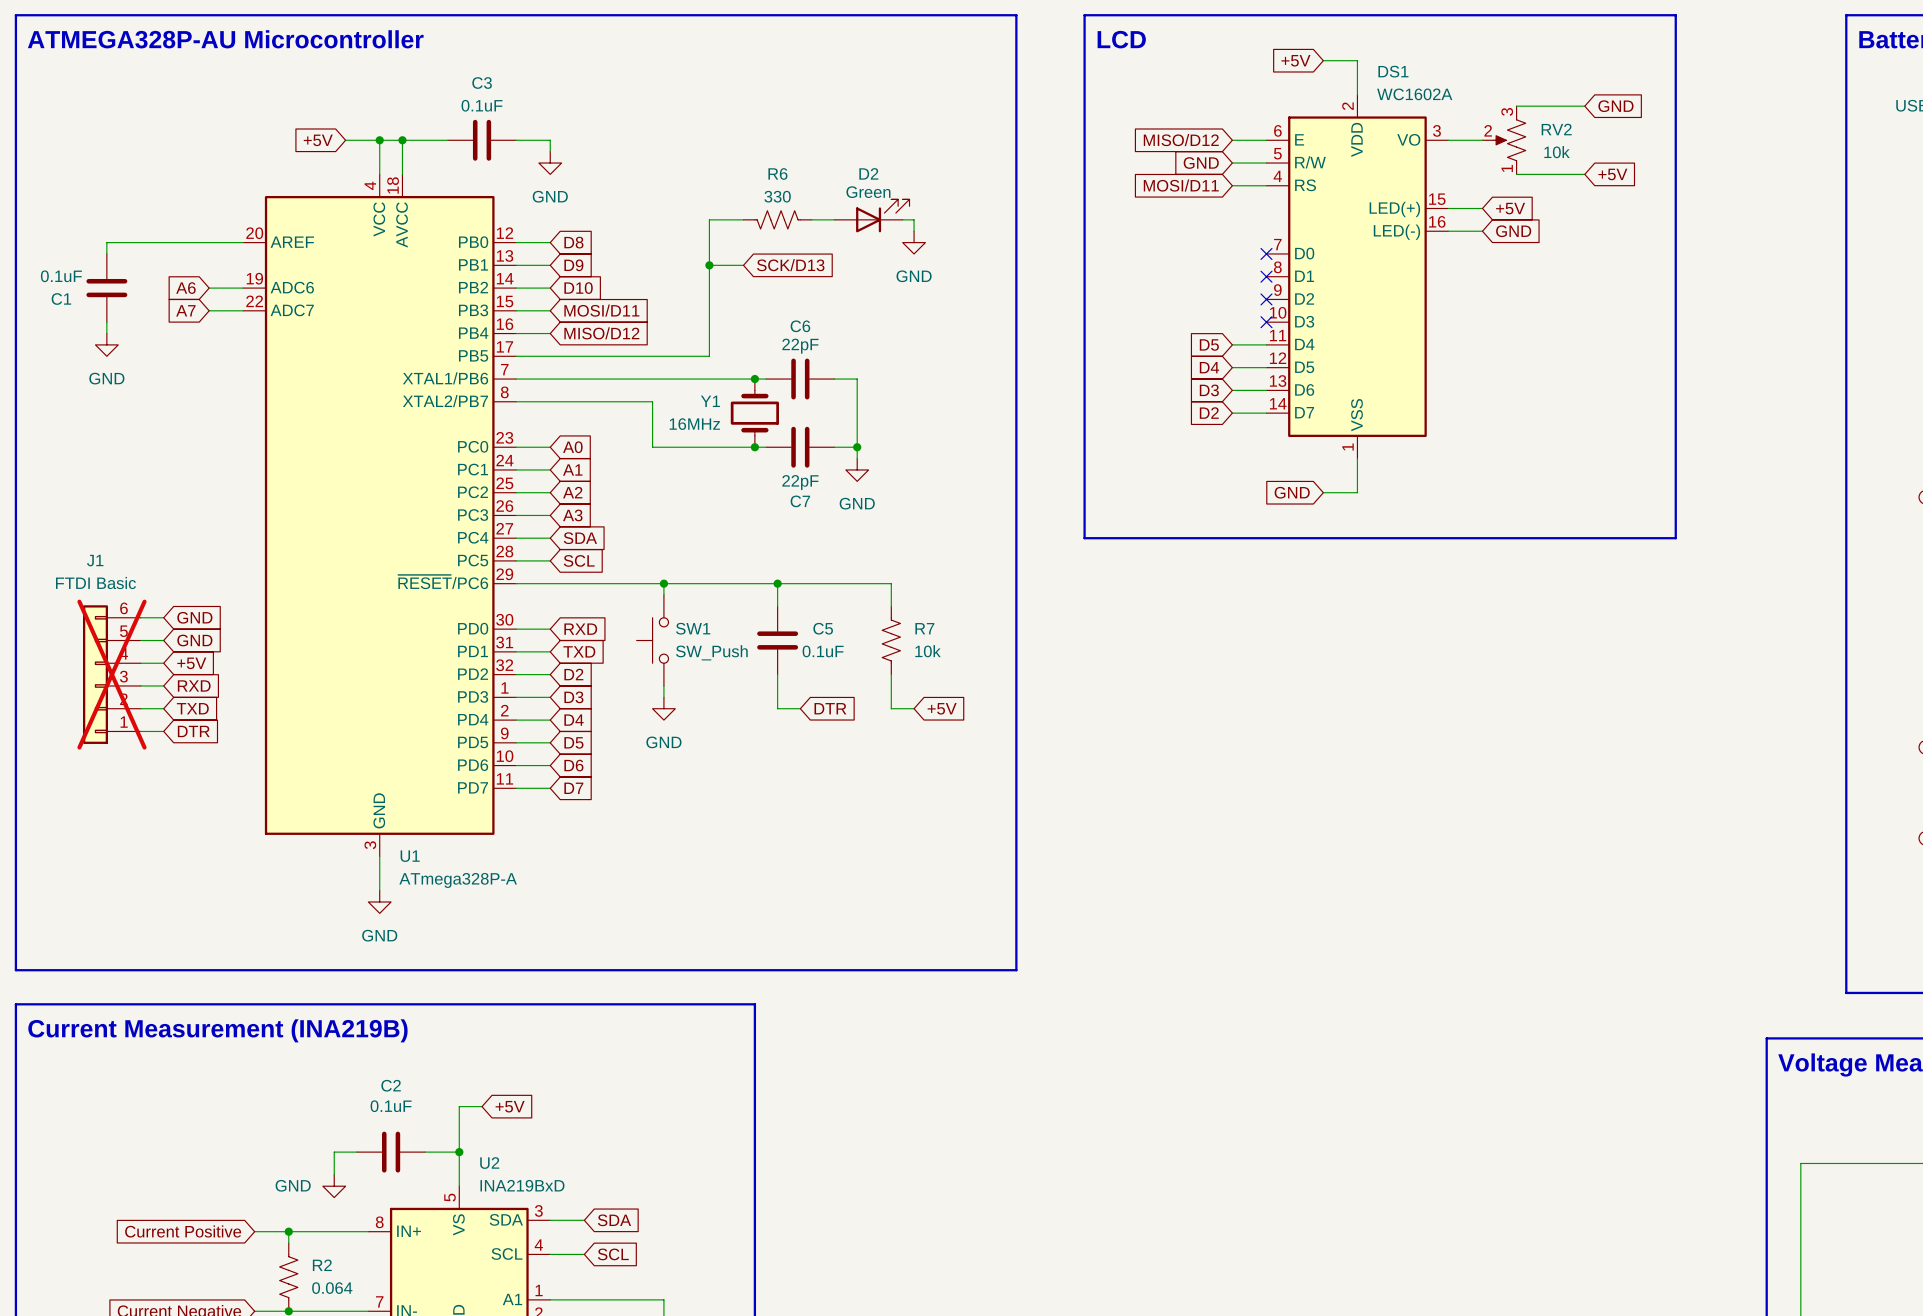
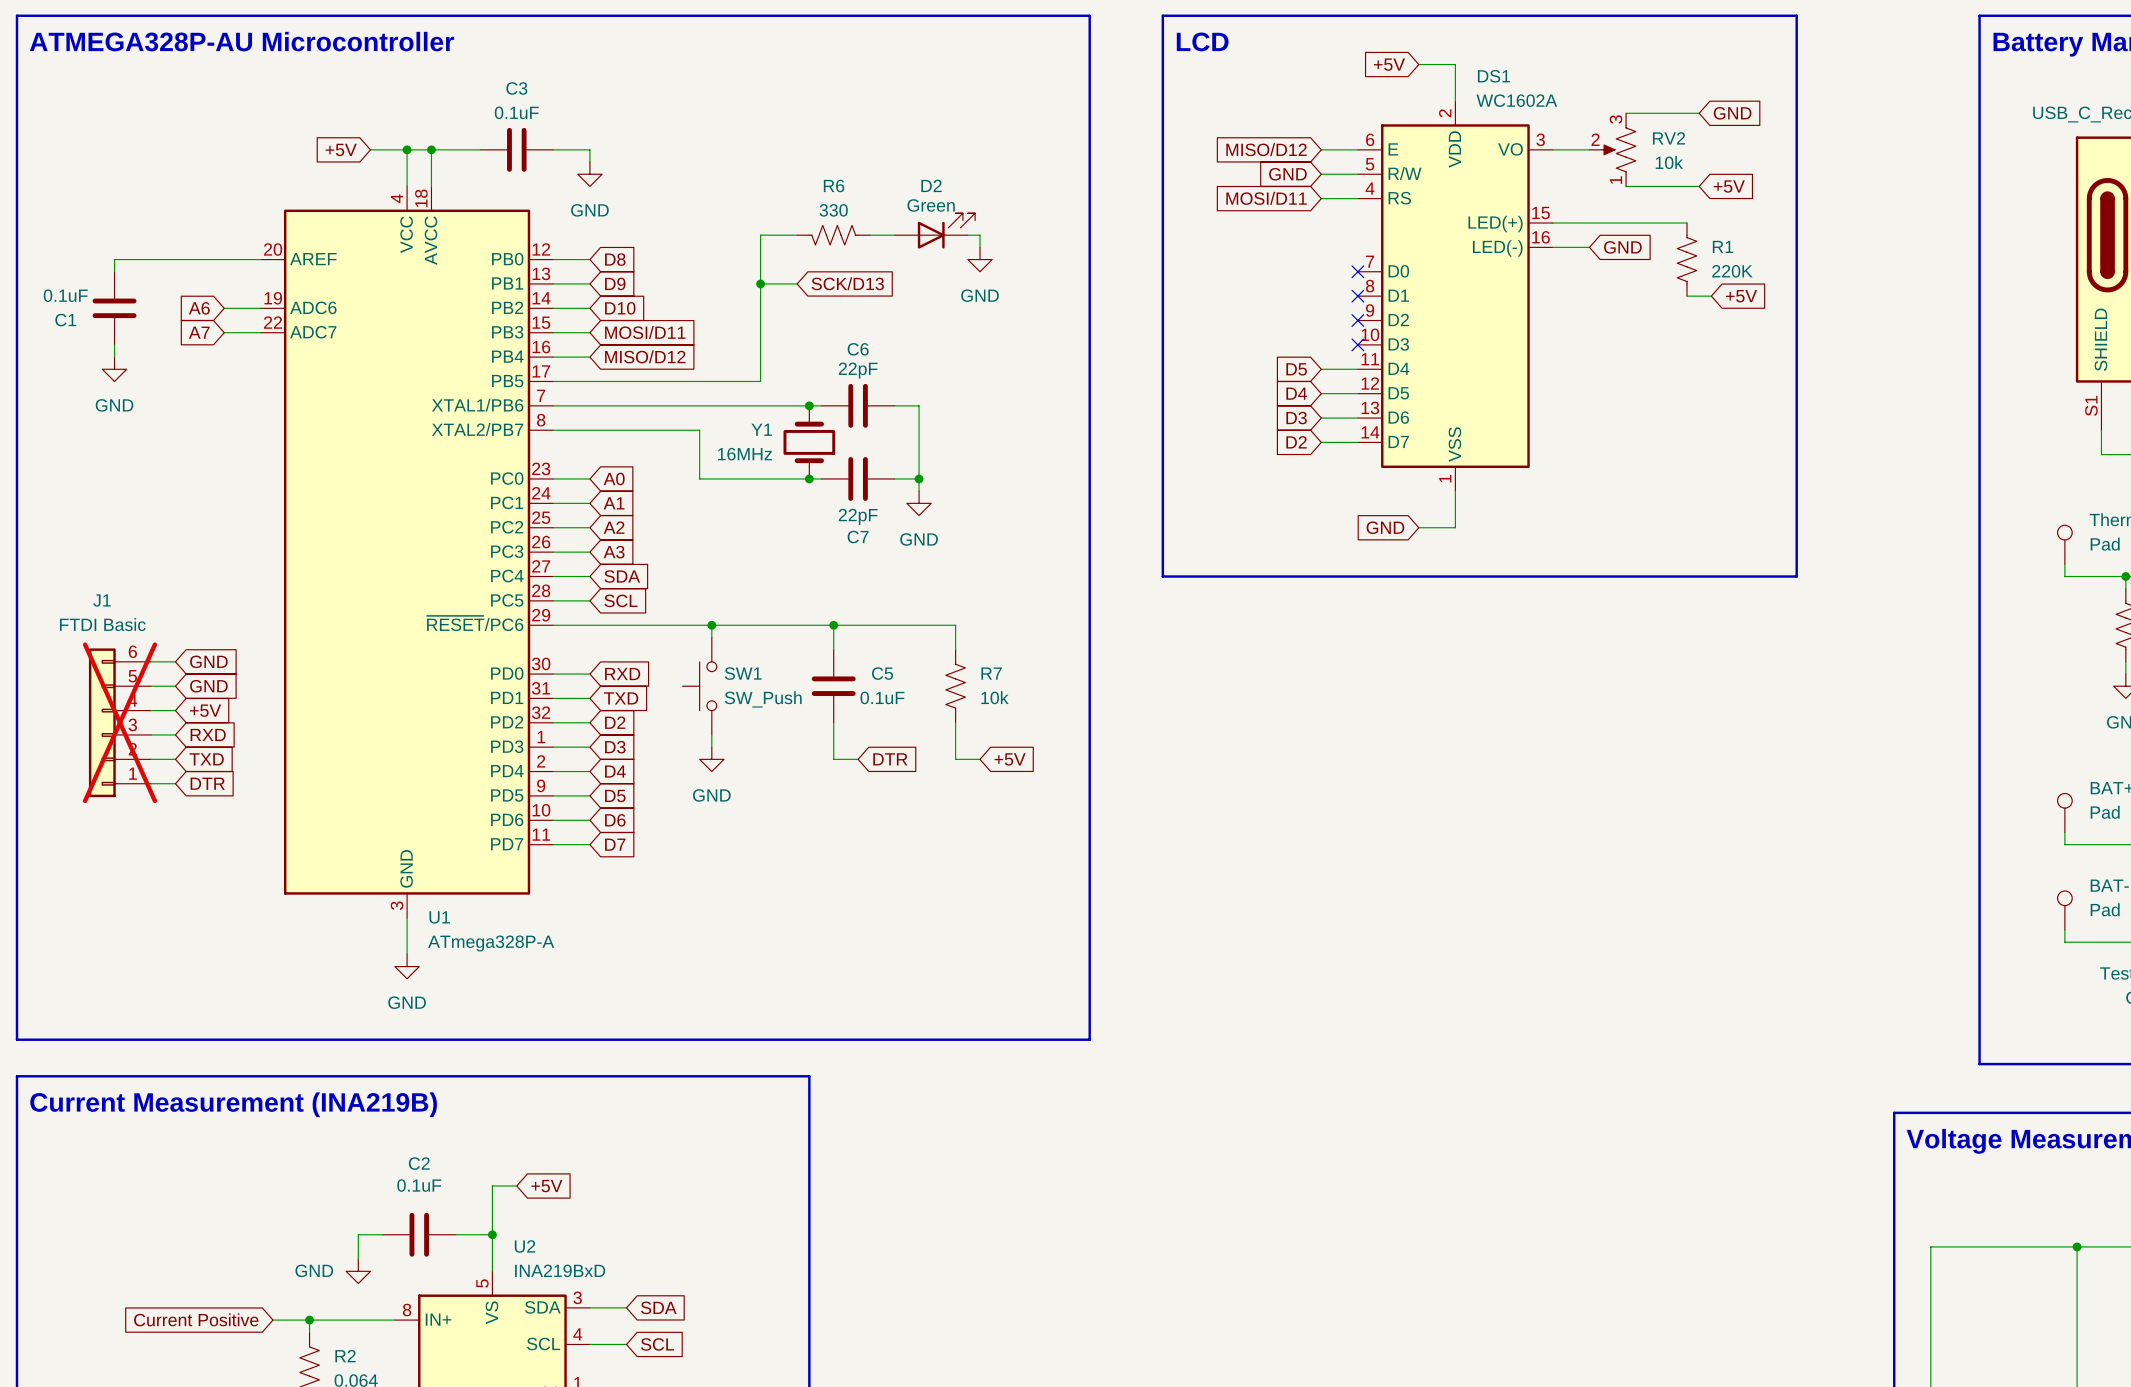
wire: none -> (1589, 223) (1687, 223)
global label position: +5V (1510, 208) -> +5V (1741, 296)
R1: none -> 220K (1687, 259)
wire: none -> (1687, 296) (1711, 296)

